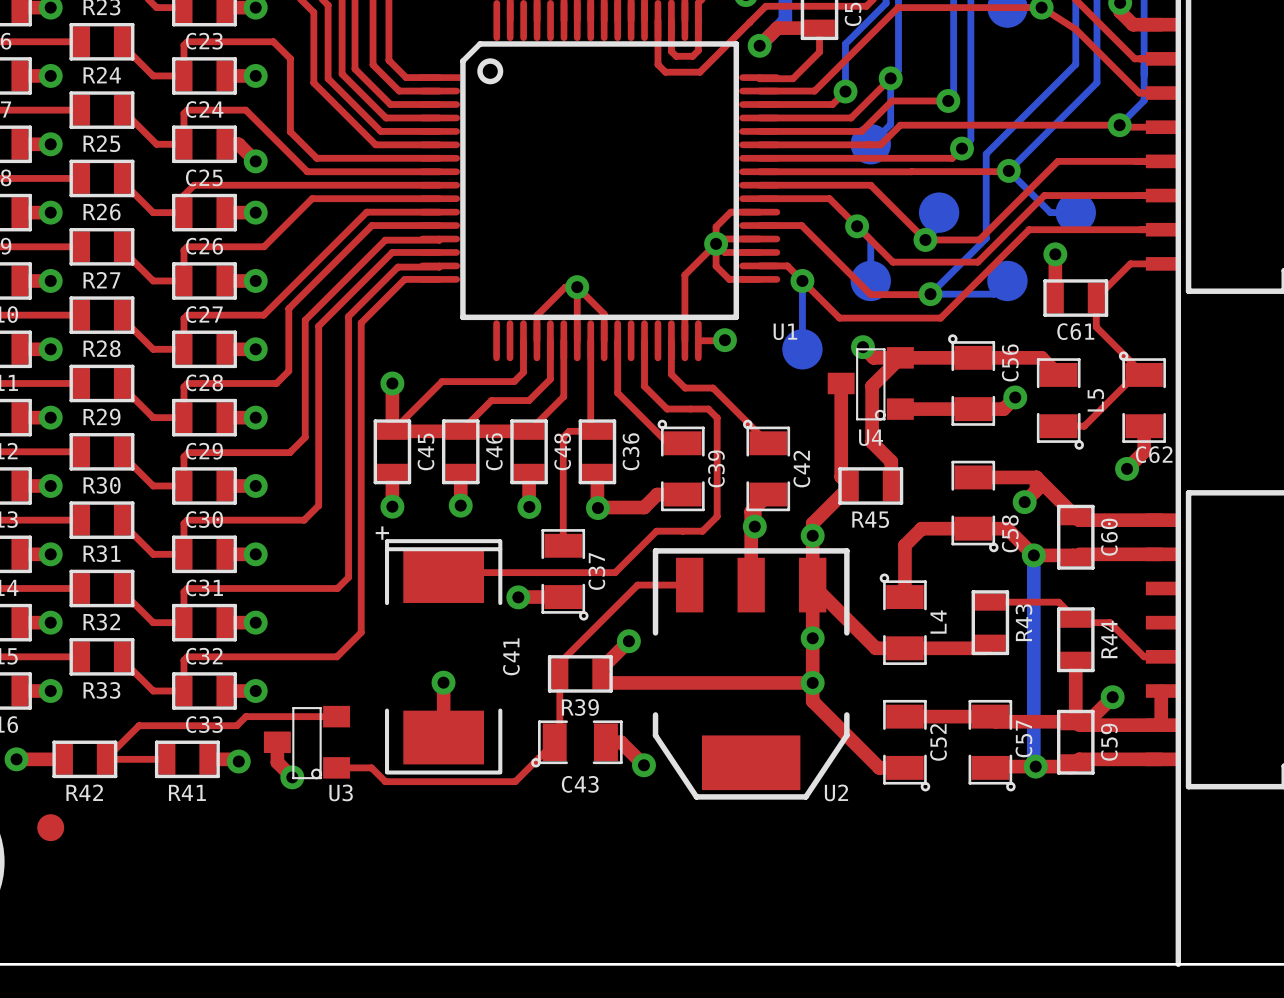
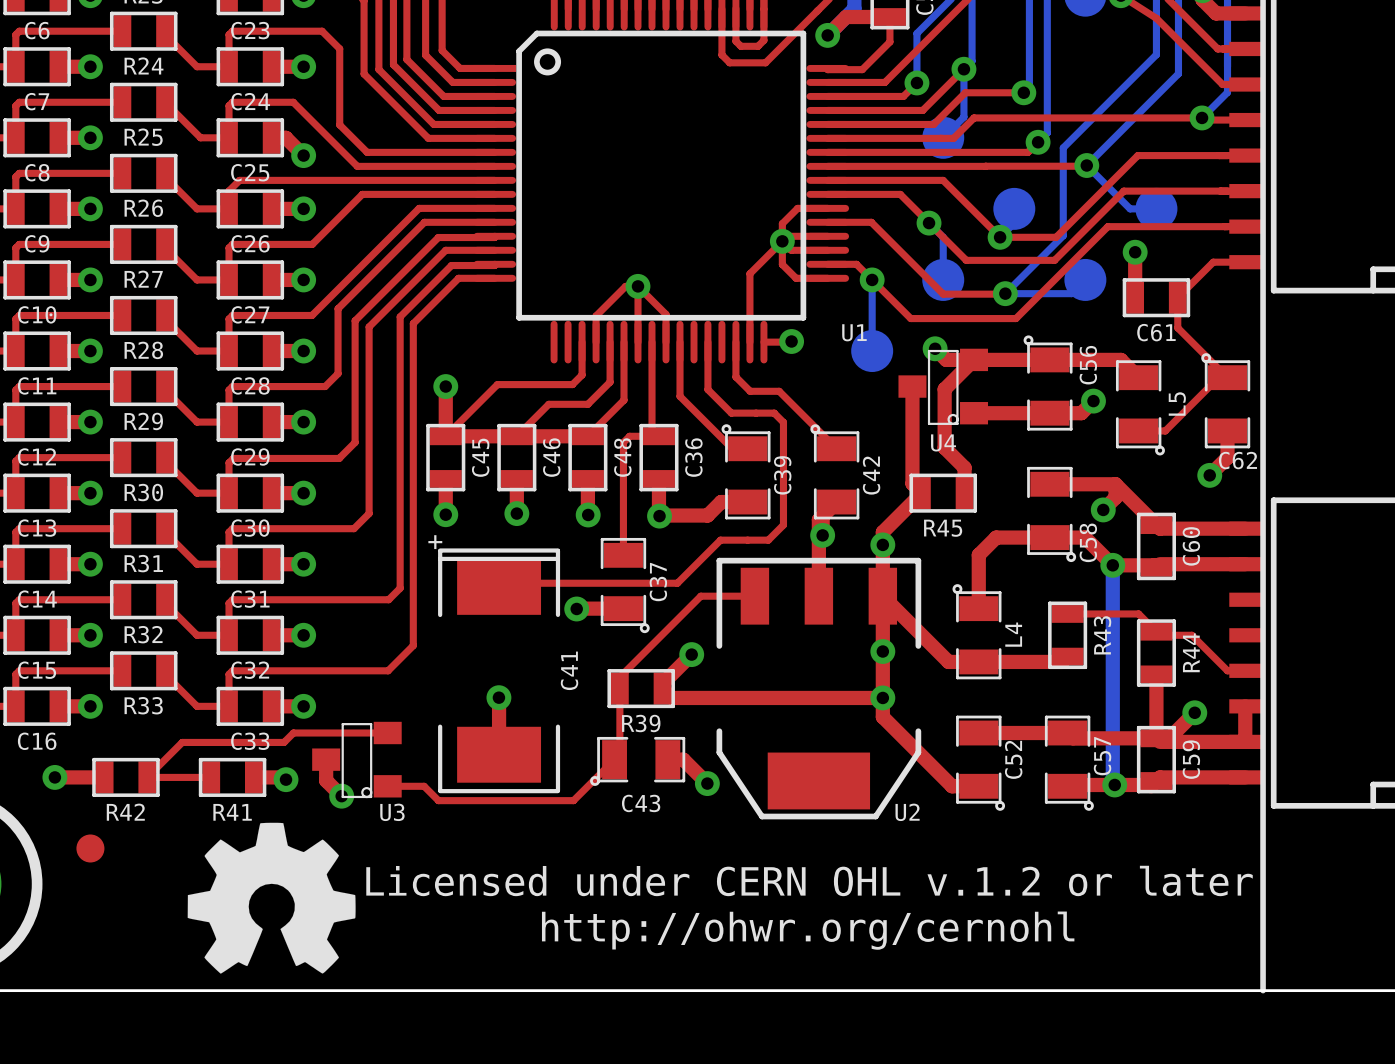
drawing: none -> [187, 822, 356, 974]
text: none -> Licensed under CERN OHL v.1.2 or later (809, 880)
text: none -> http://ohwr.org/cernohl (808, 930)

